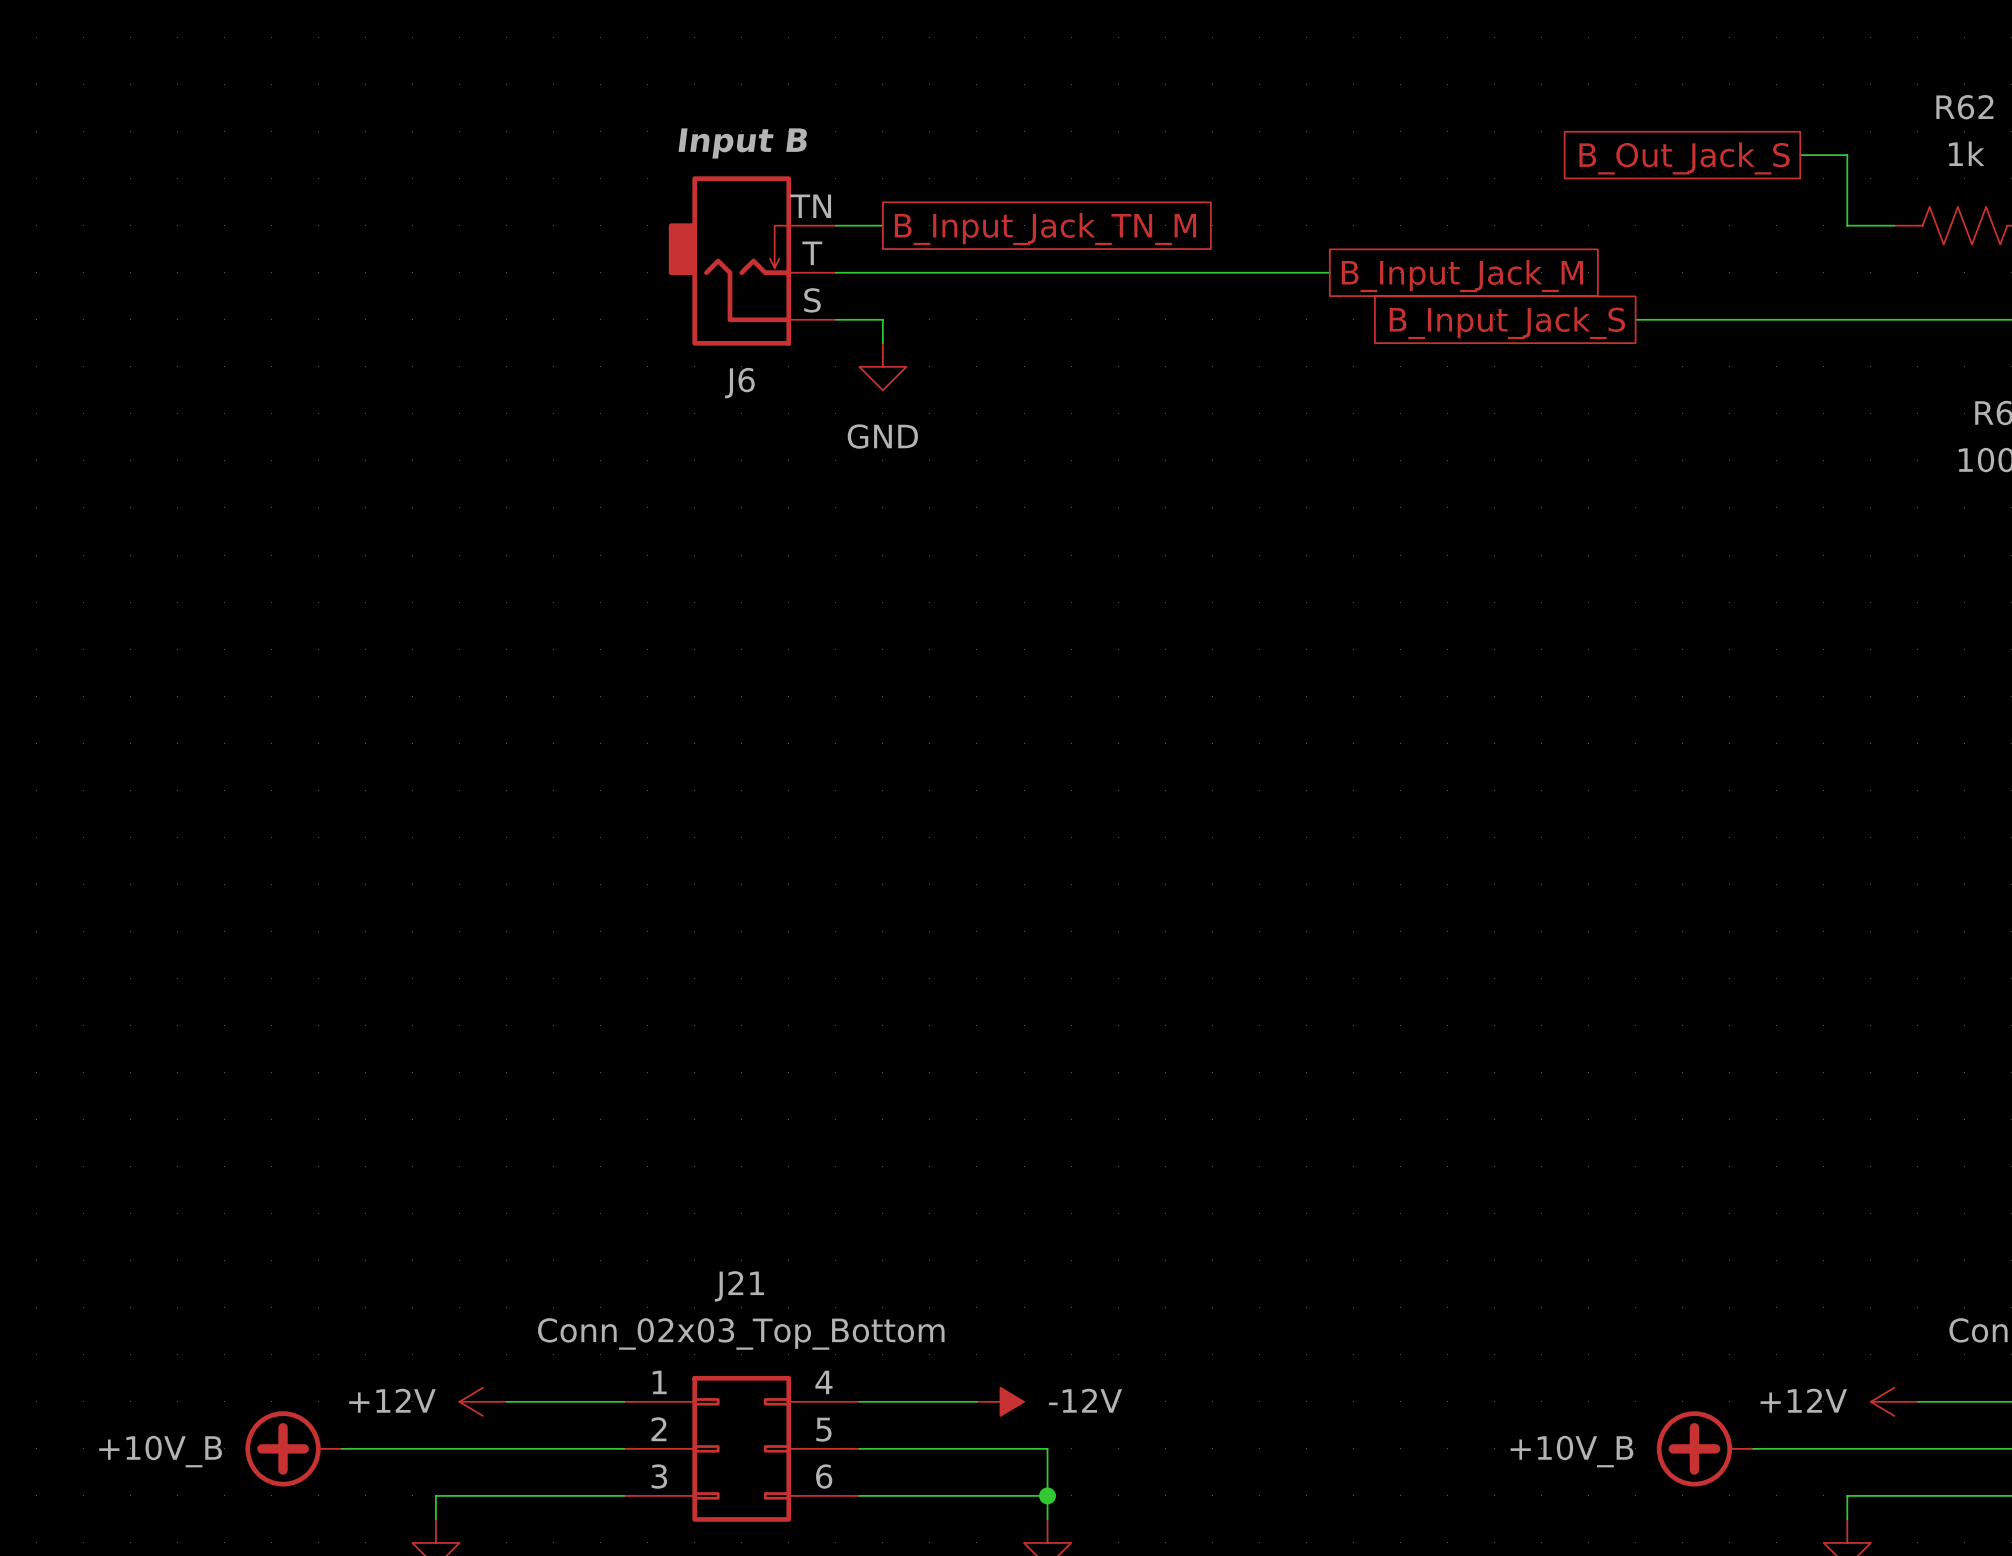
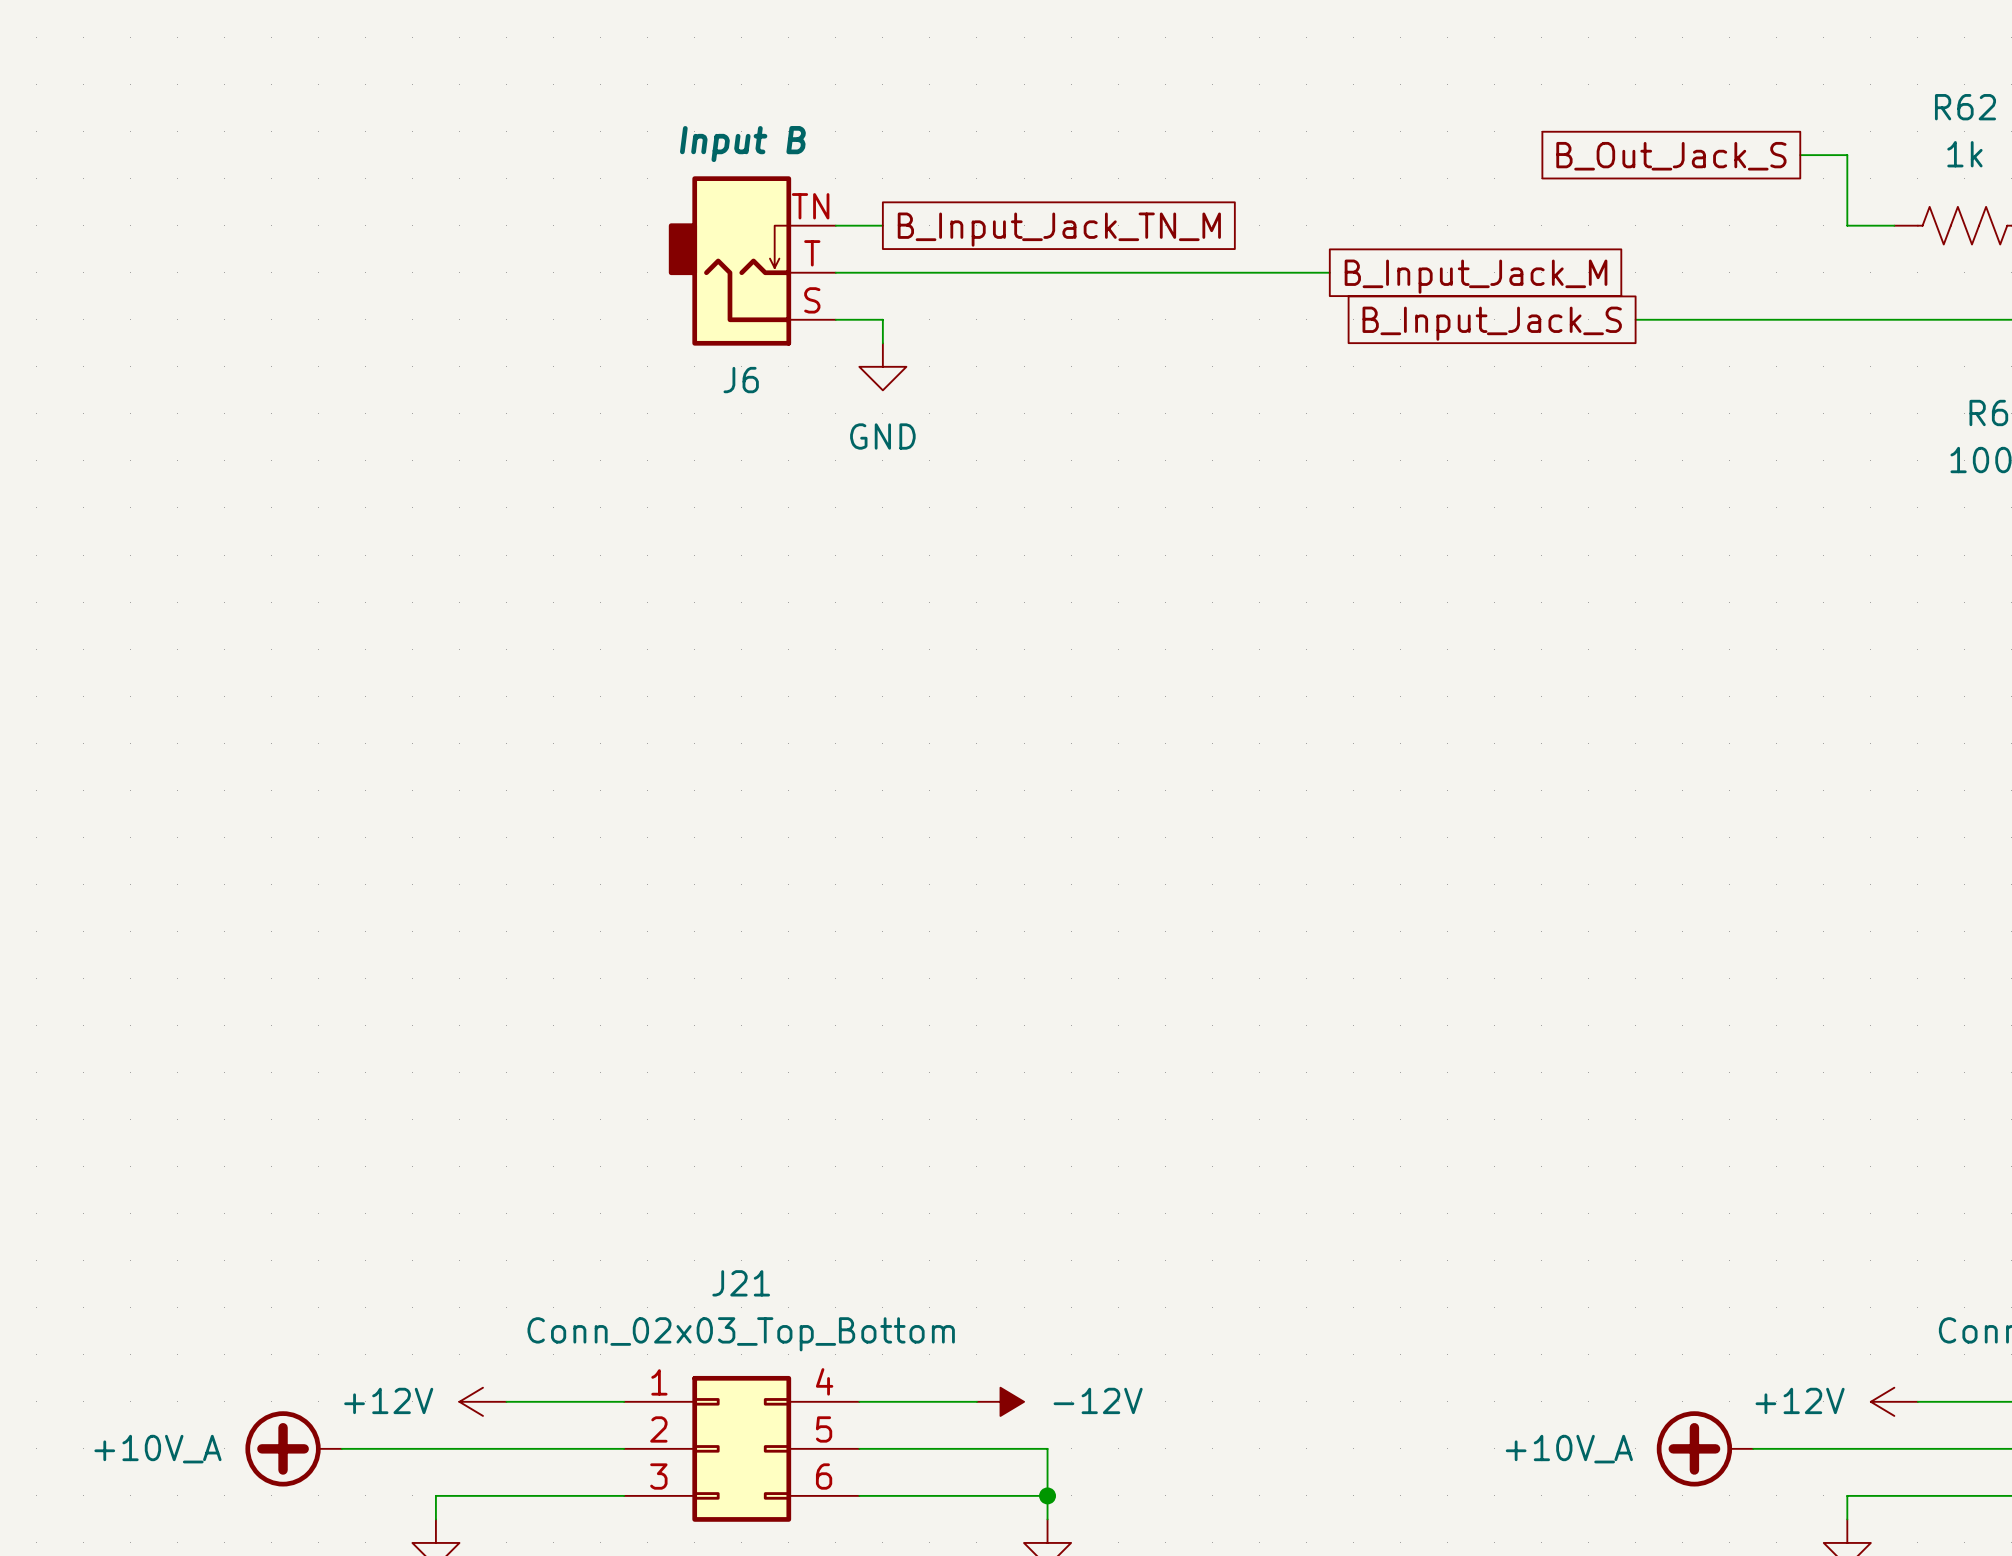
power symbol: +10V_B (293, 1448) -> +10V_A (293, 1448)
power symbol: +10V_B (1705, 1448) -> +10V_A (1705, 1448)

